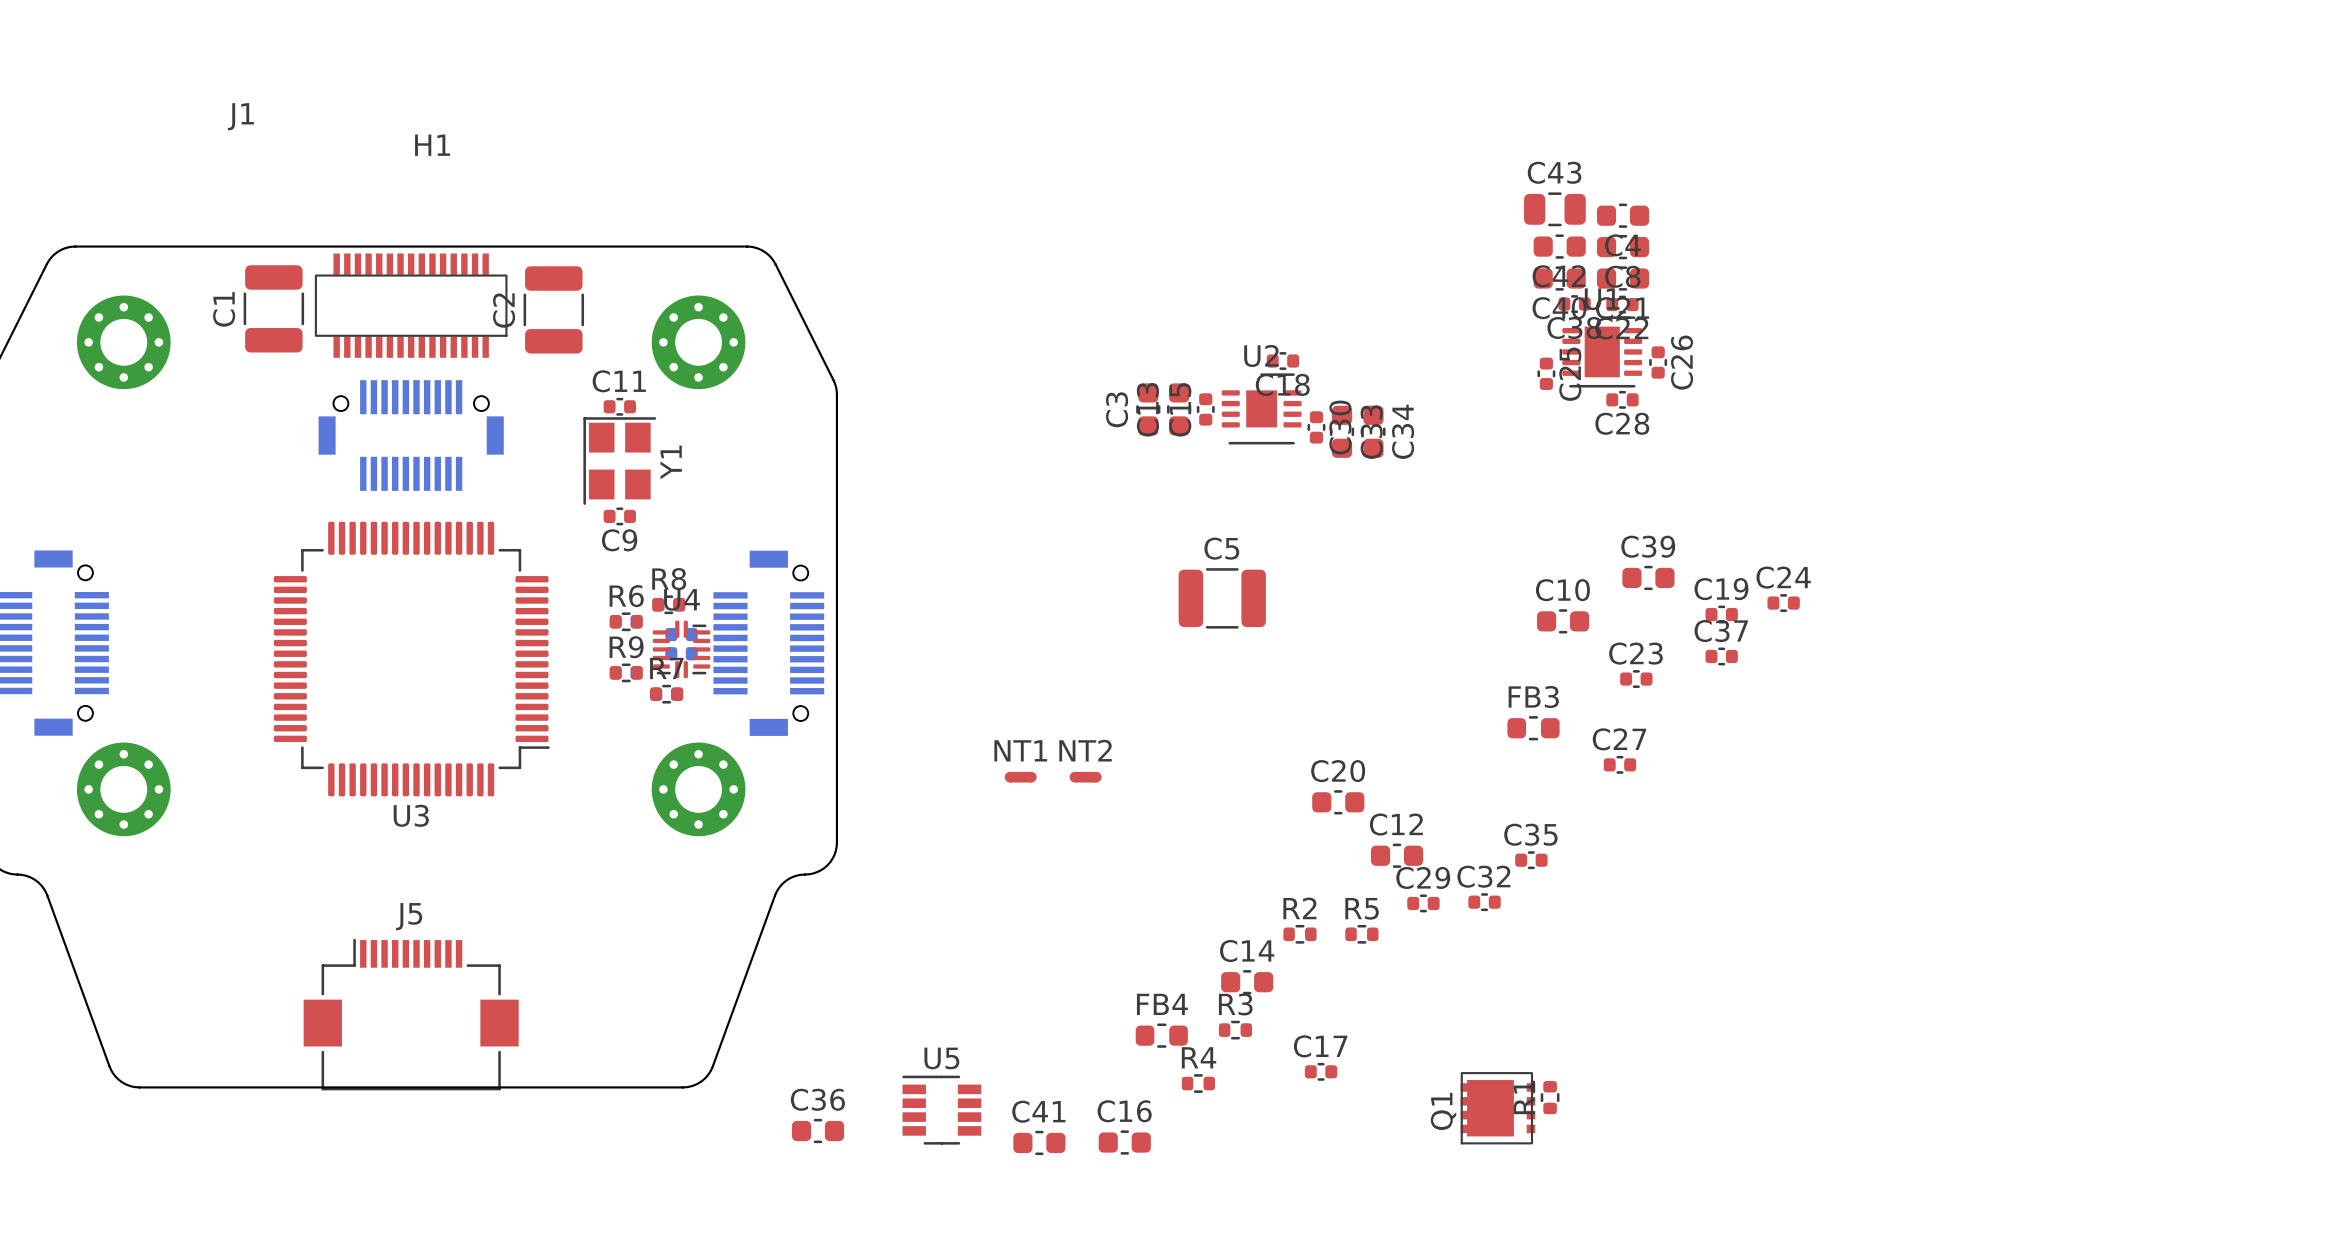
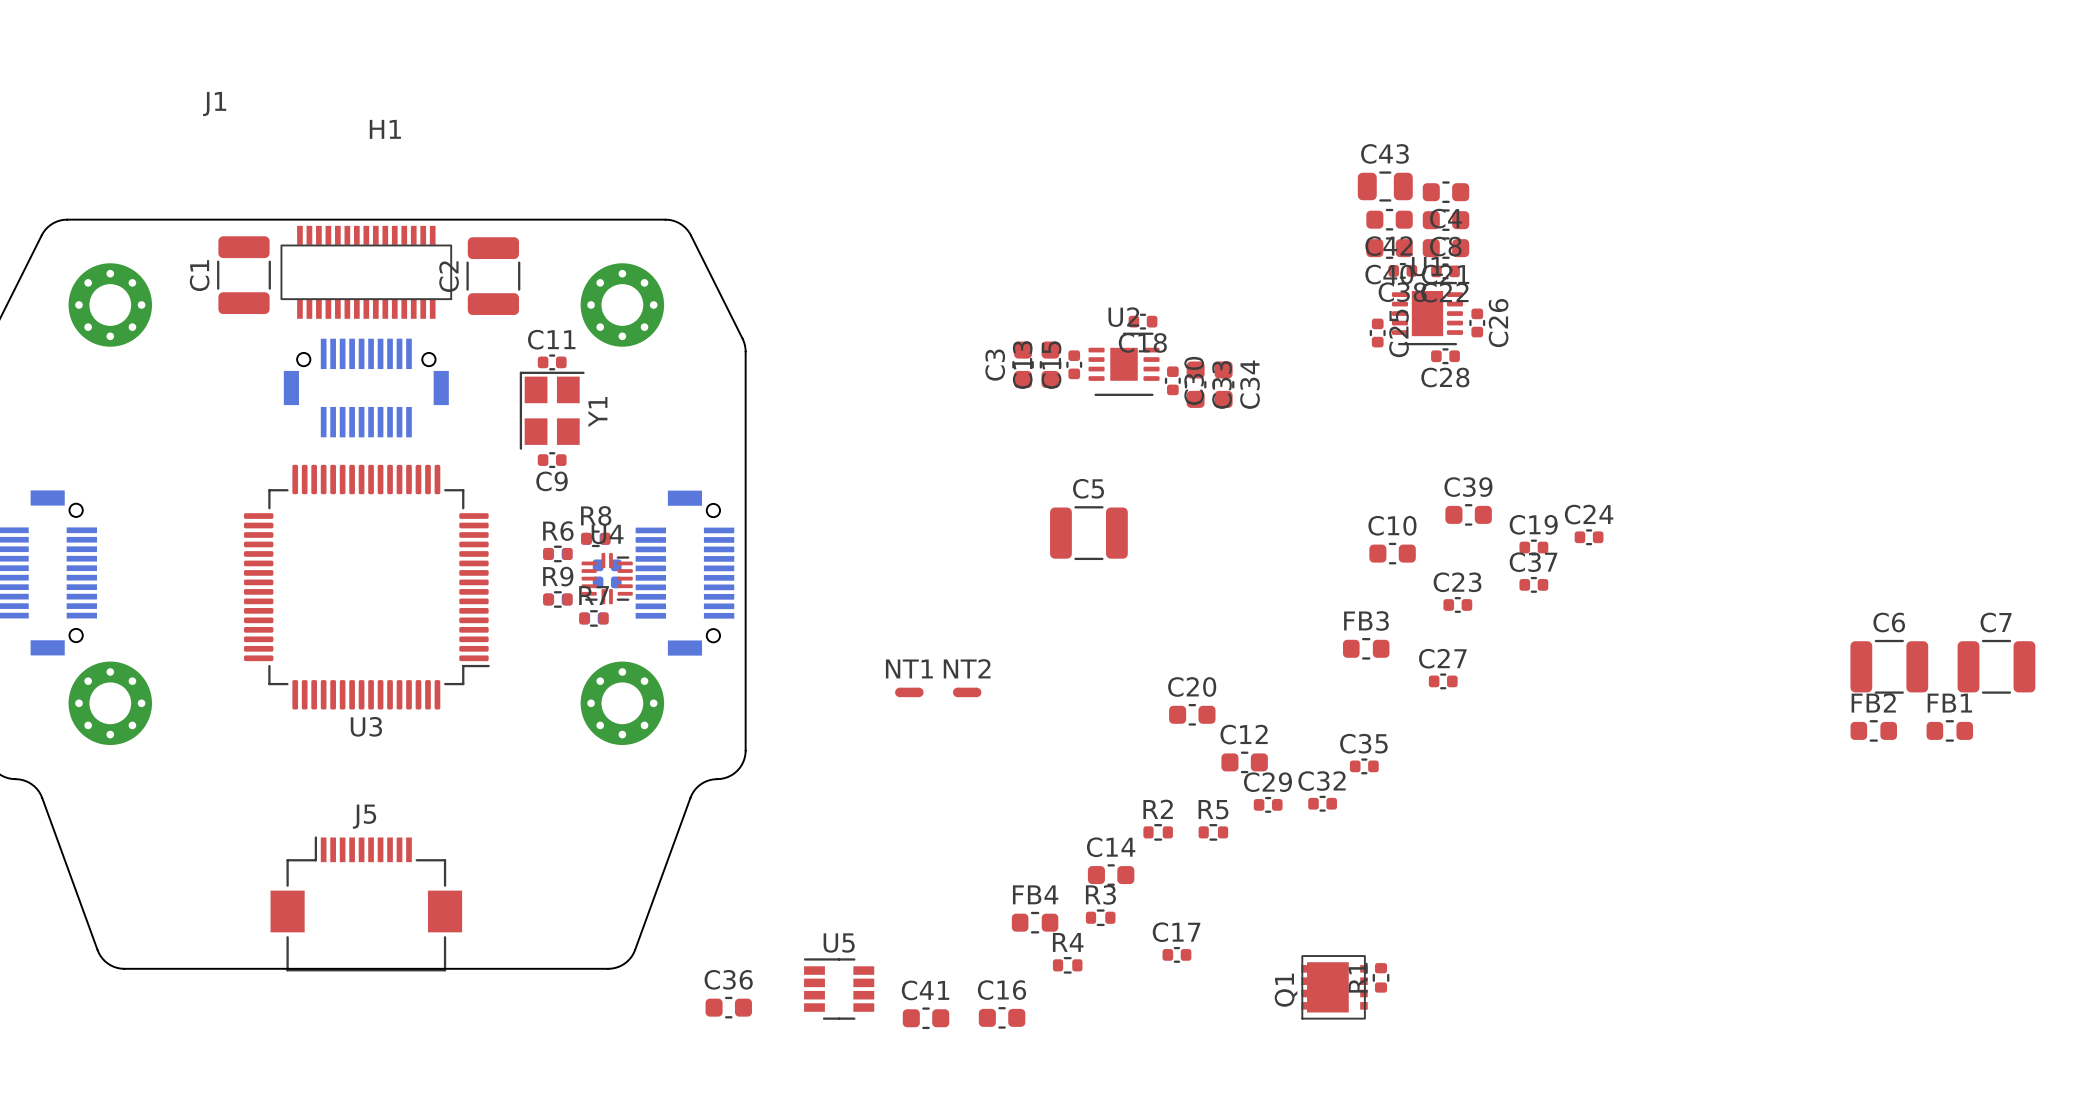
C6: none -> (1889, 666)
C7: none -> (1996, 666)
FB2: none -> (1873, 730)
FB1: none -> (1949, 730)

